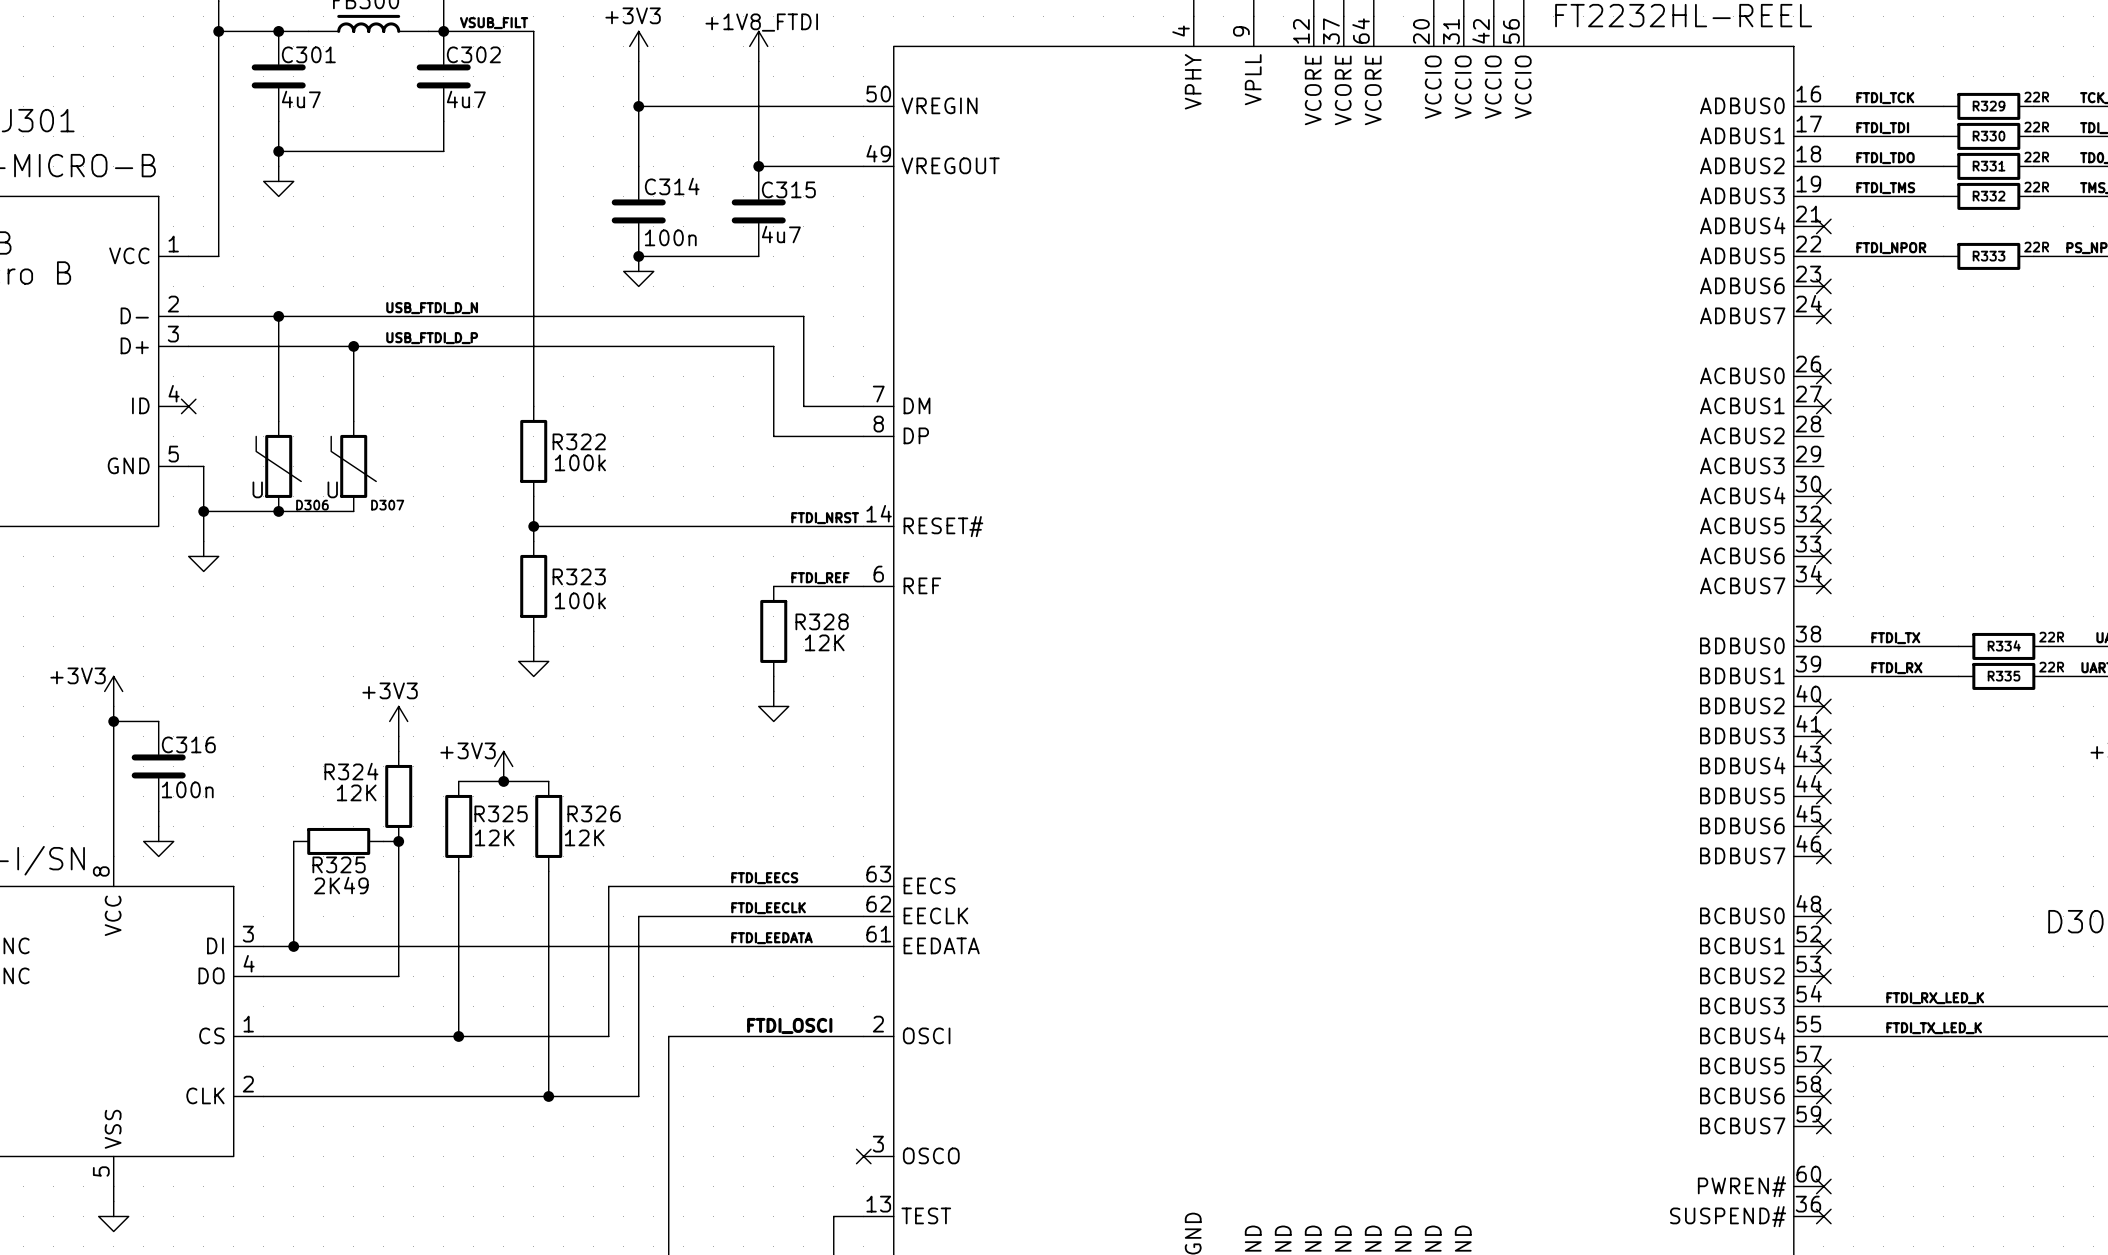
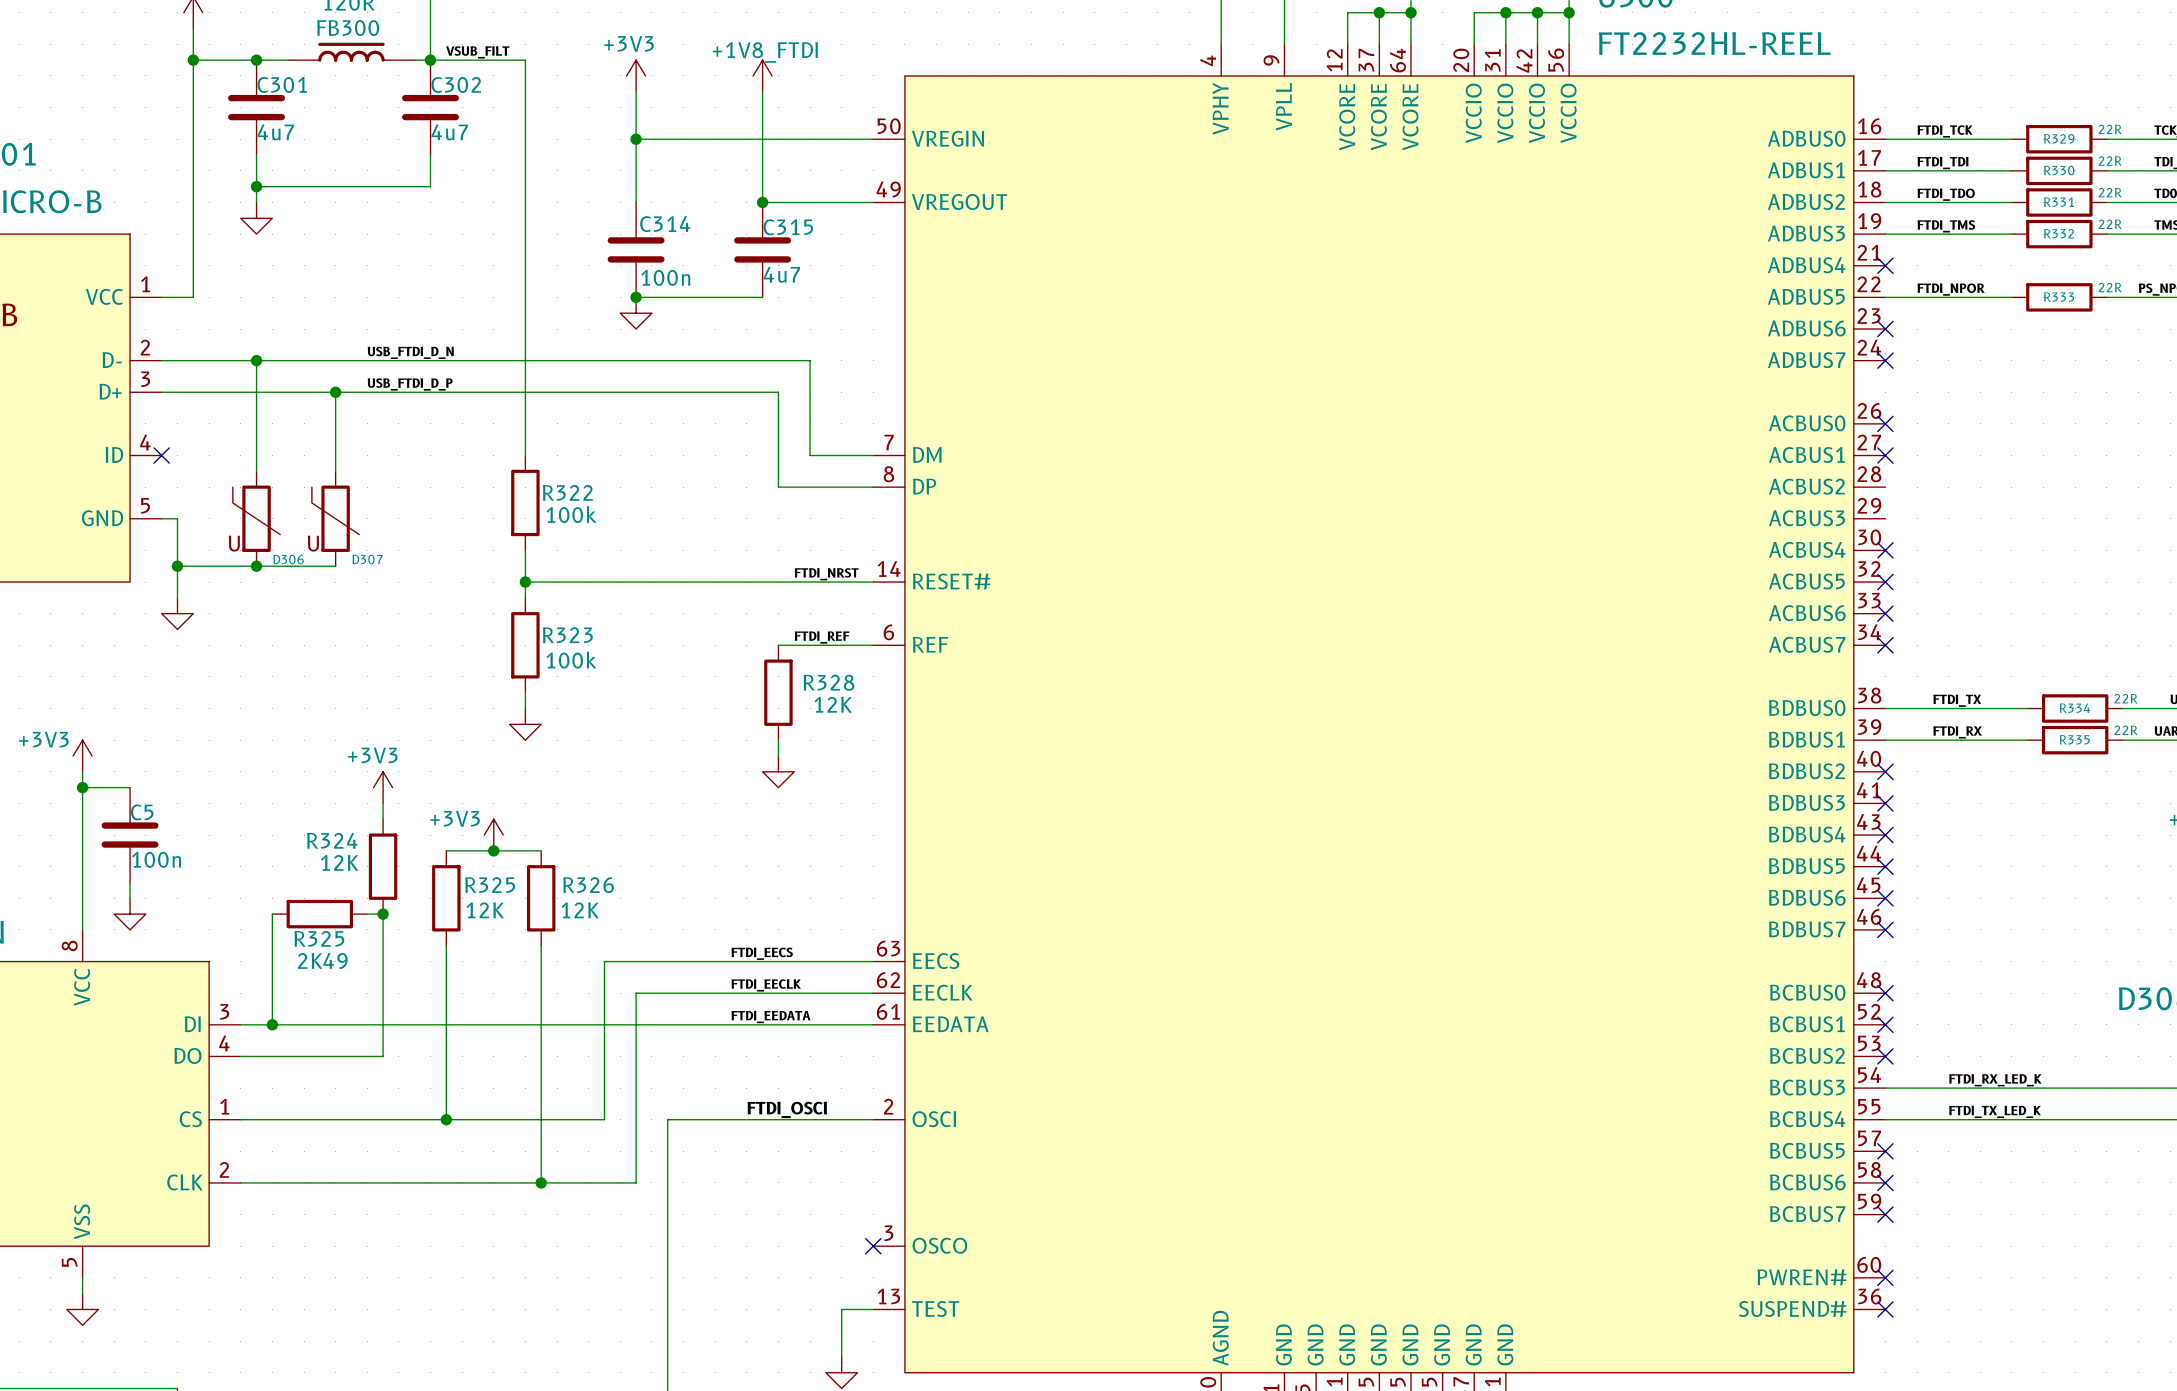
C316 name: C316 (188, 744) -> C5 (142, 812)

